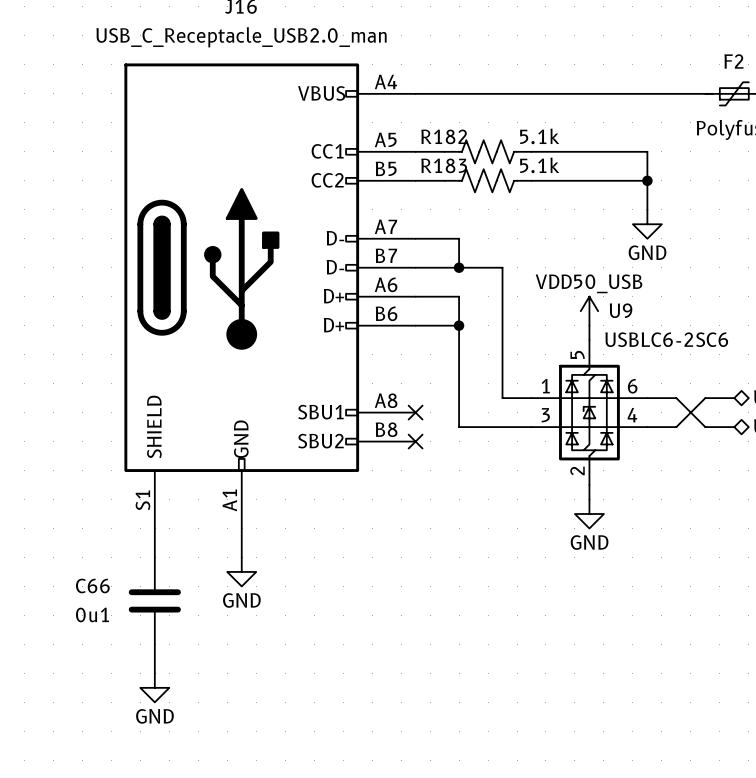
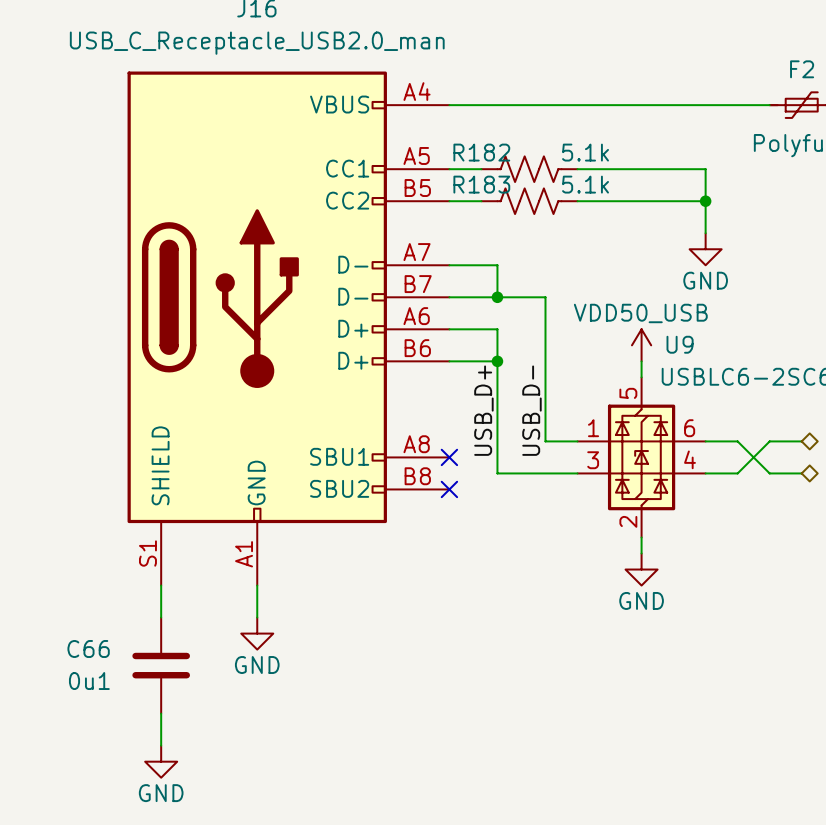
label: none -> USB_D- (531, 410)
label: none -> USB_D+ (483, 410)

